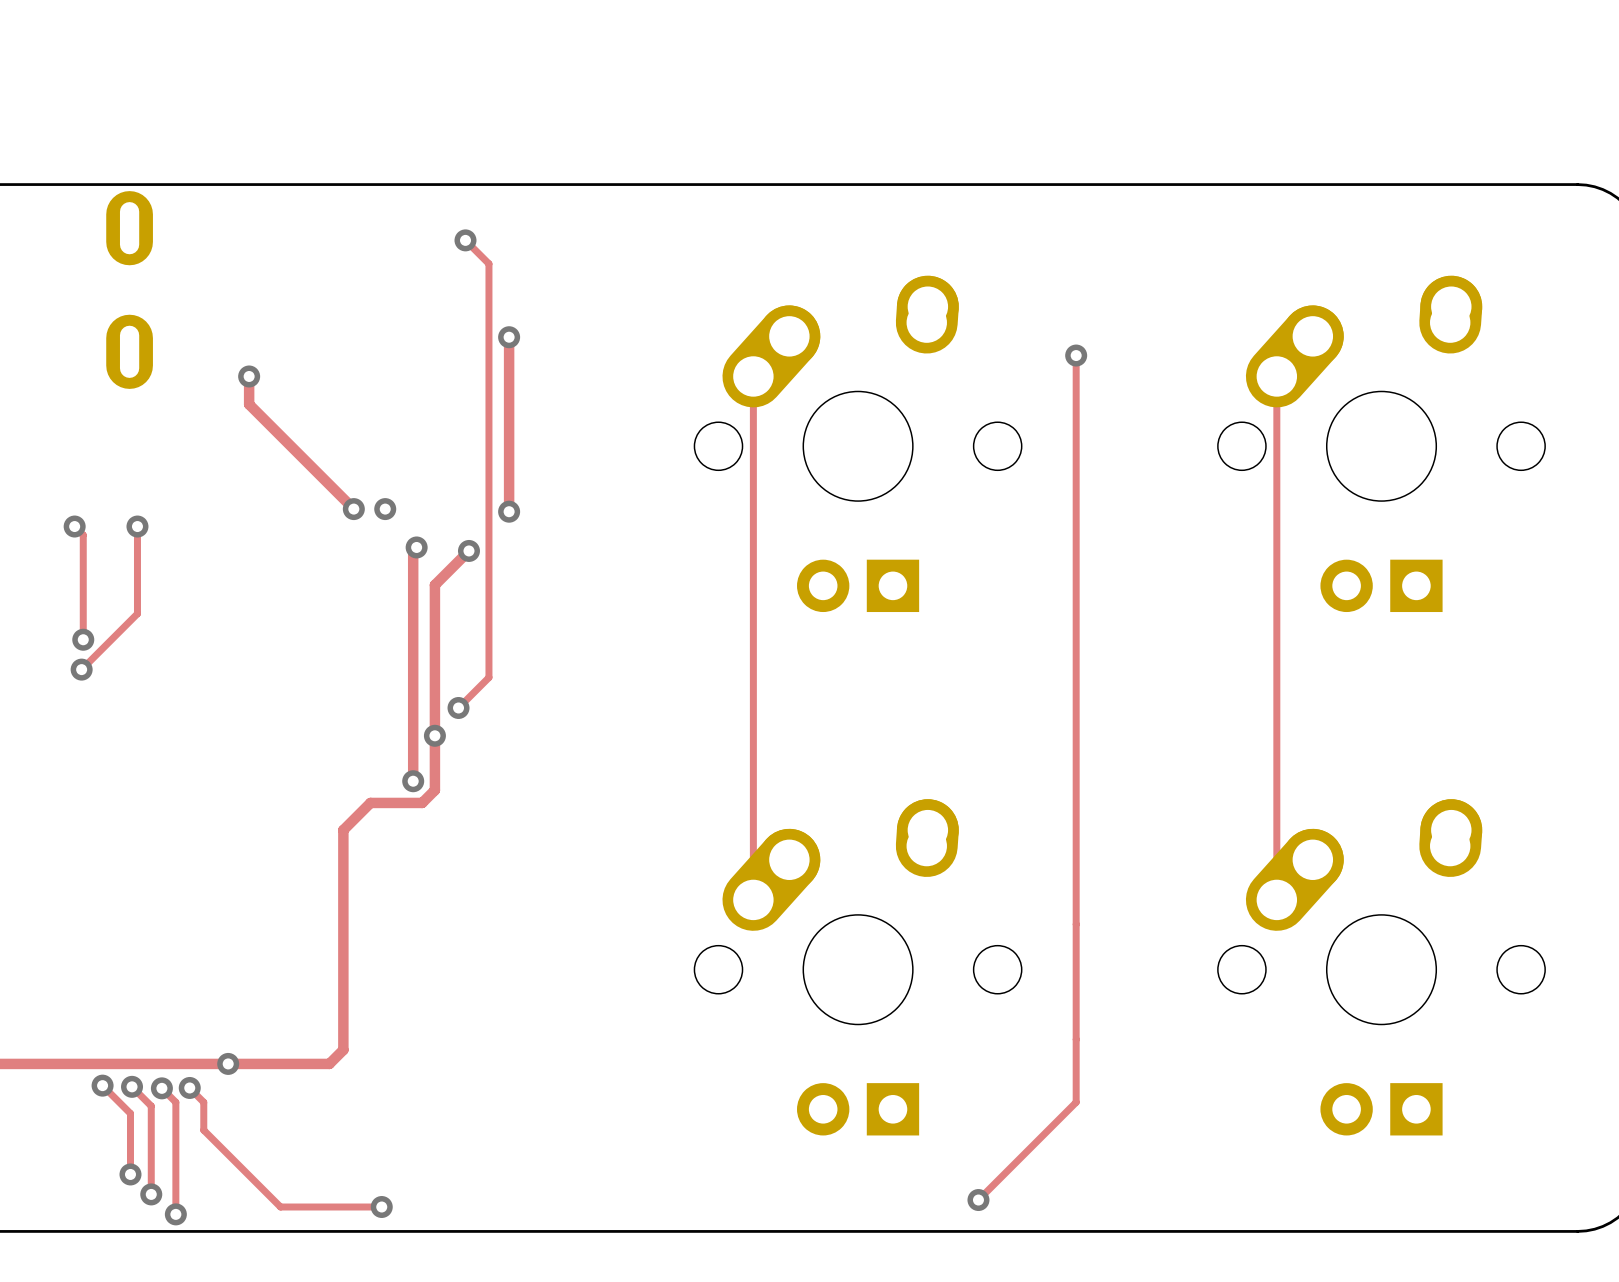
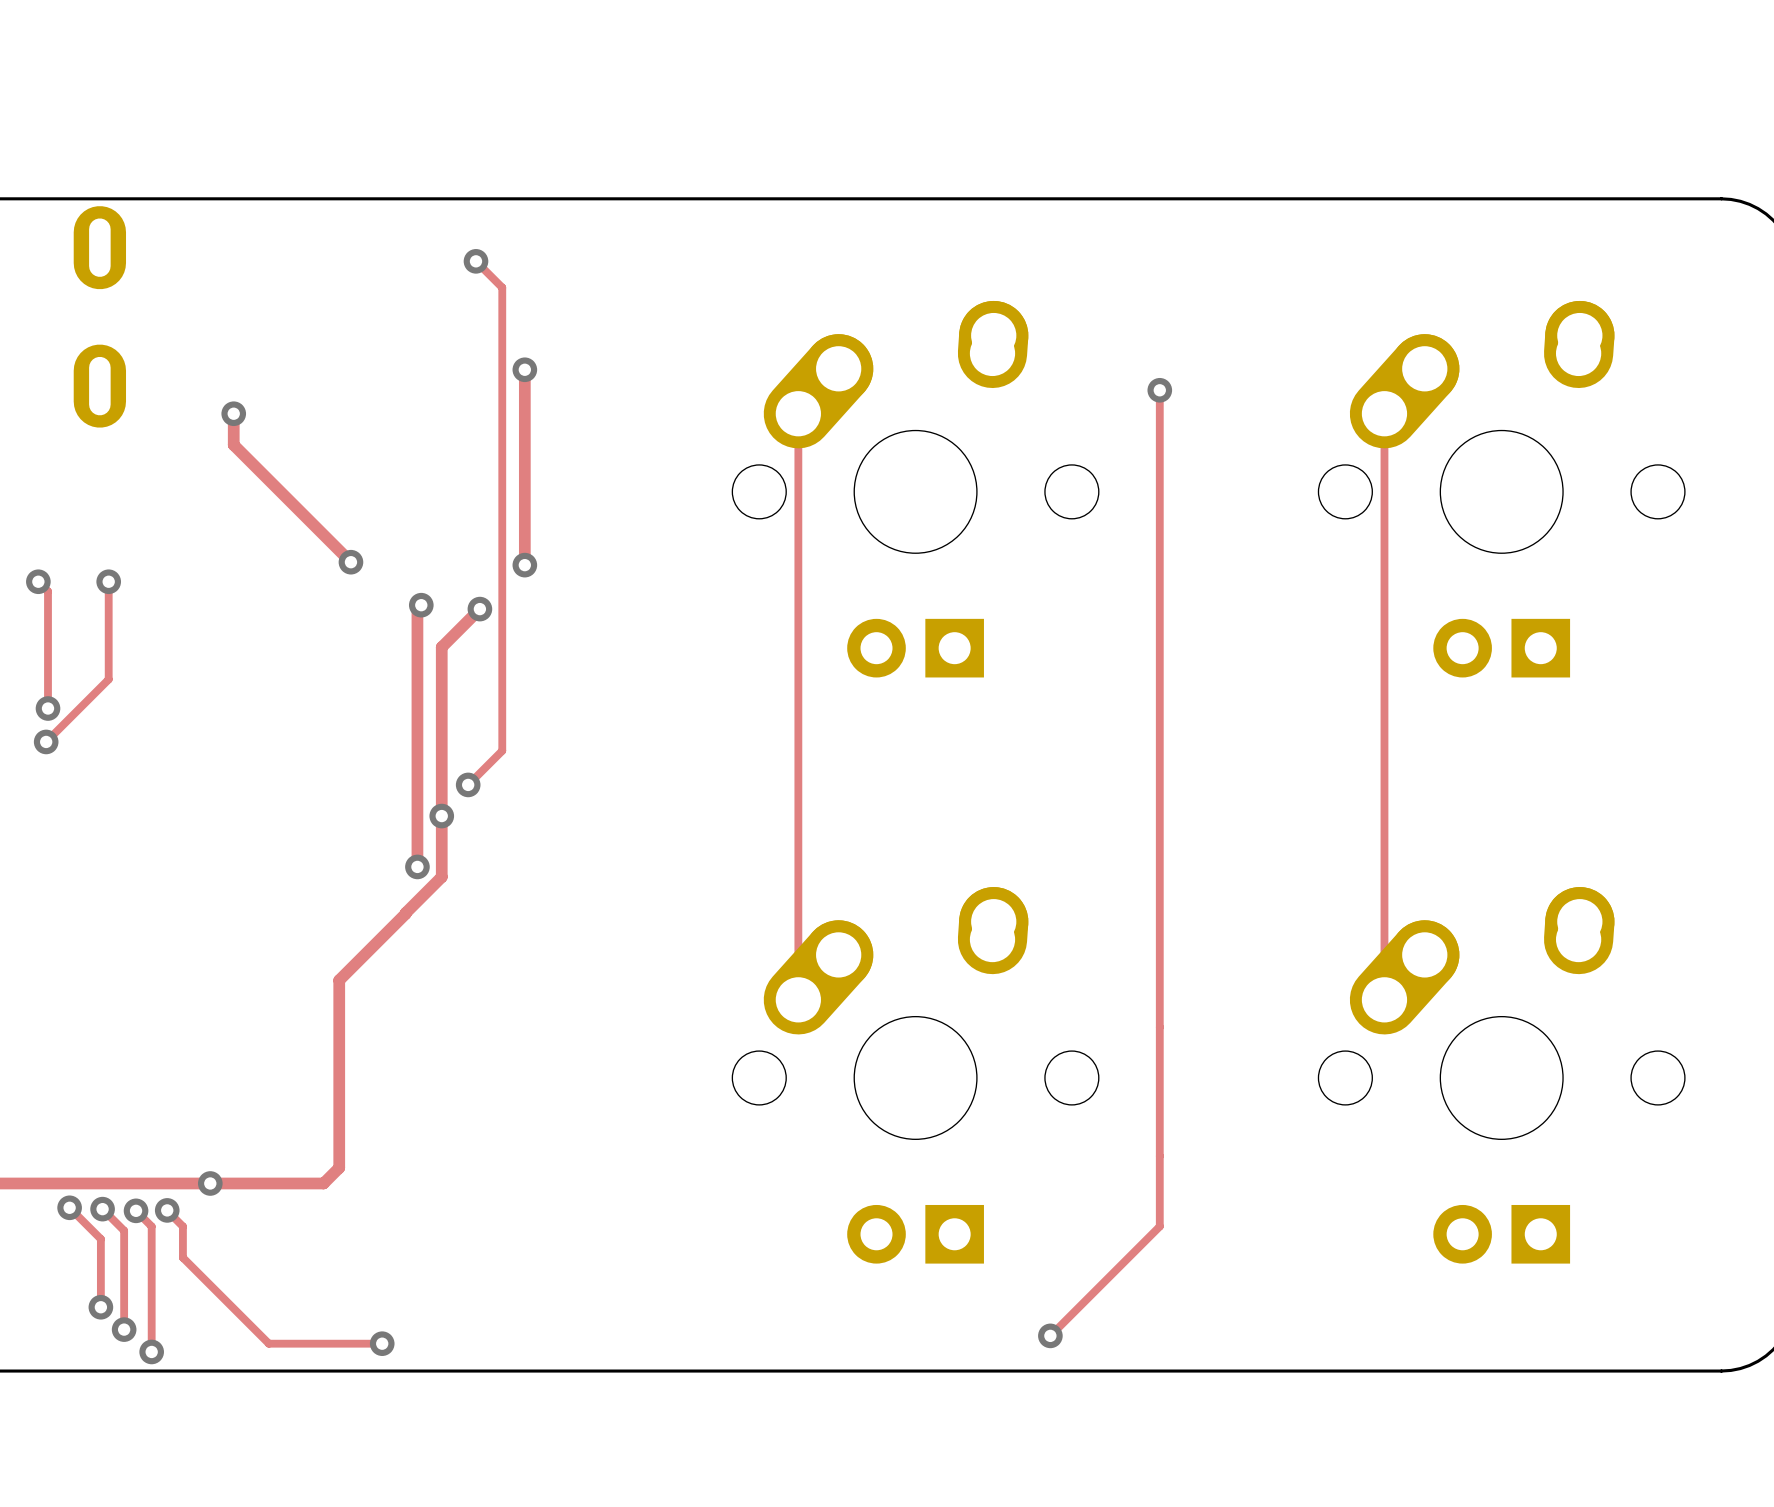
via: (385, 509) -> none
track: (422, 802) (370, 802) (343, 830) (343, 882) -> (427, 891) (339, 980)

